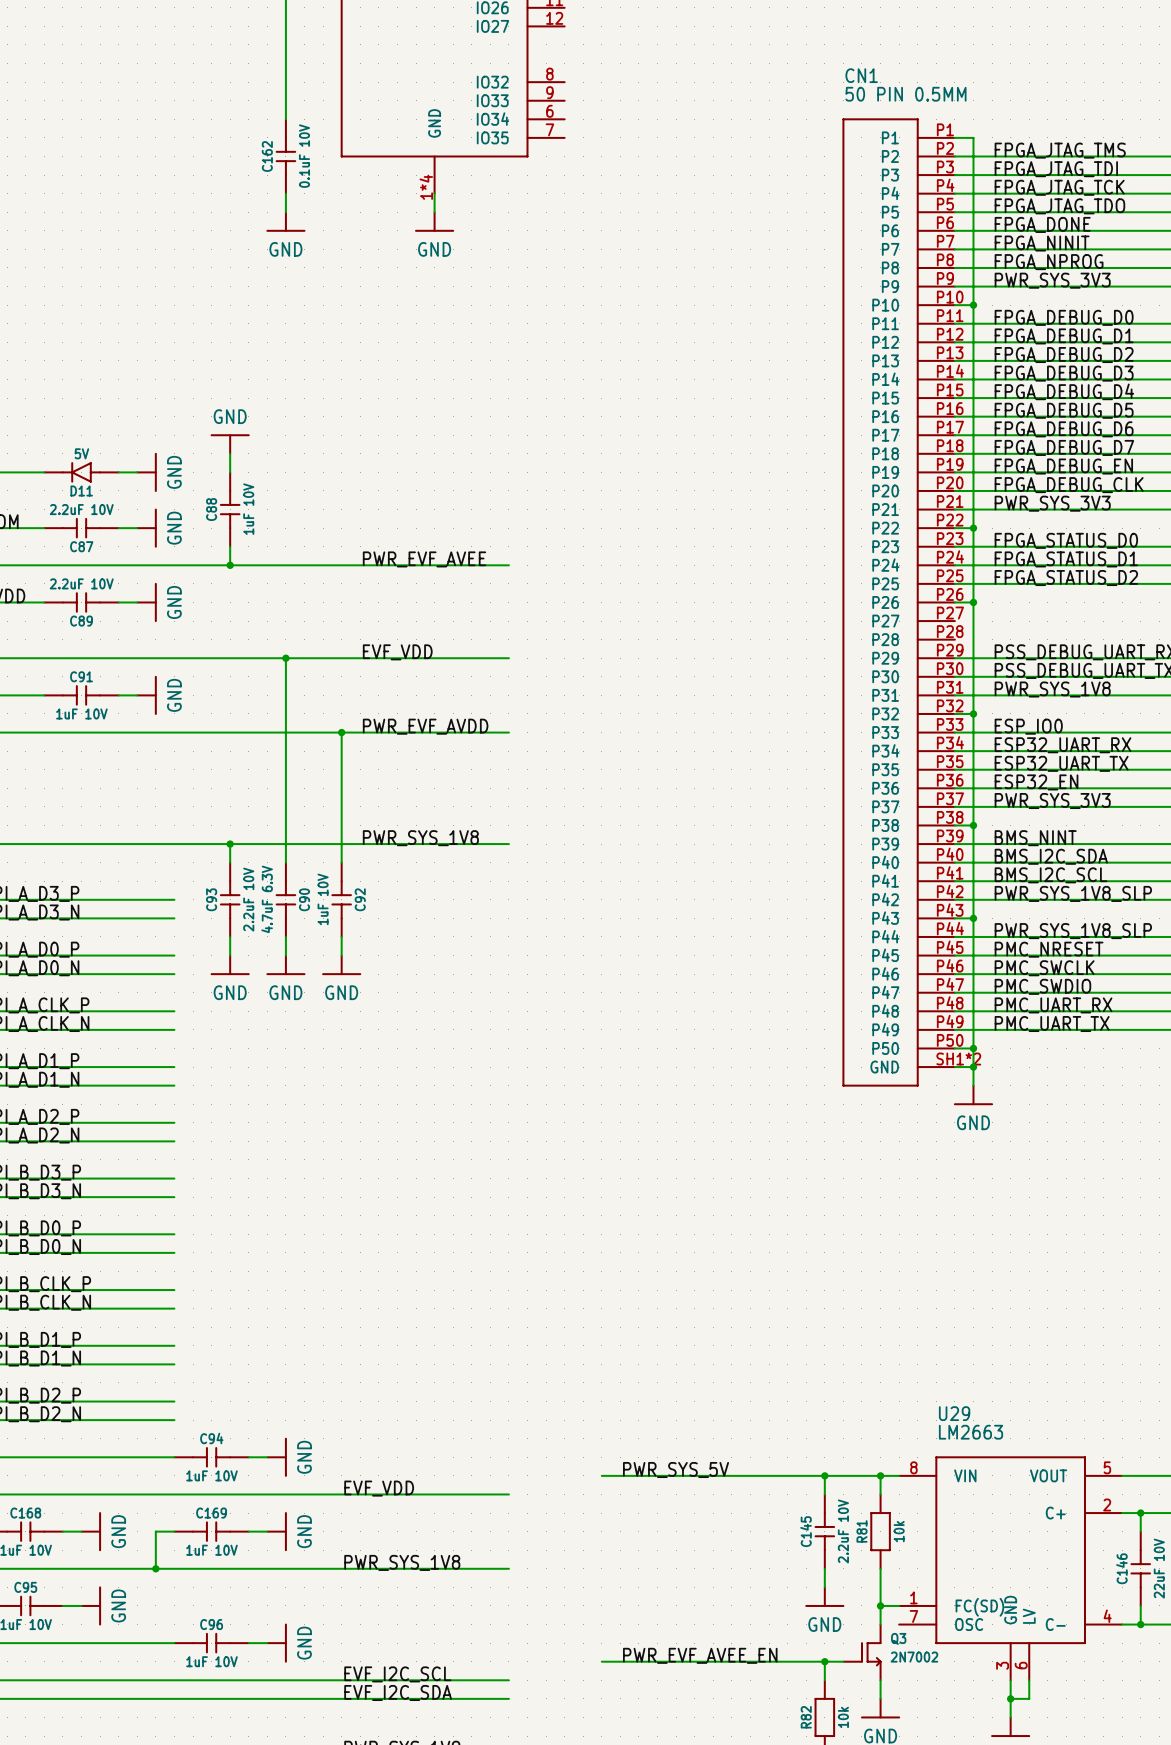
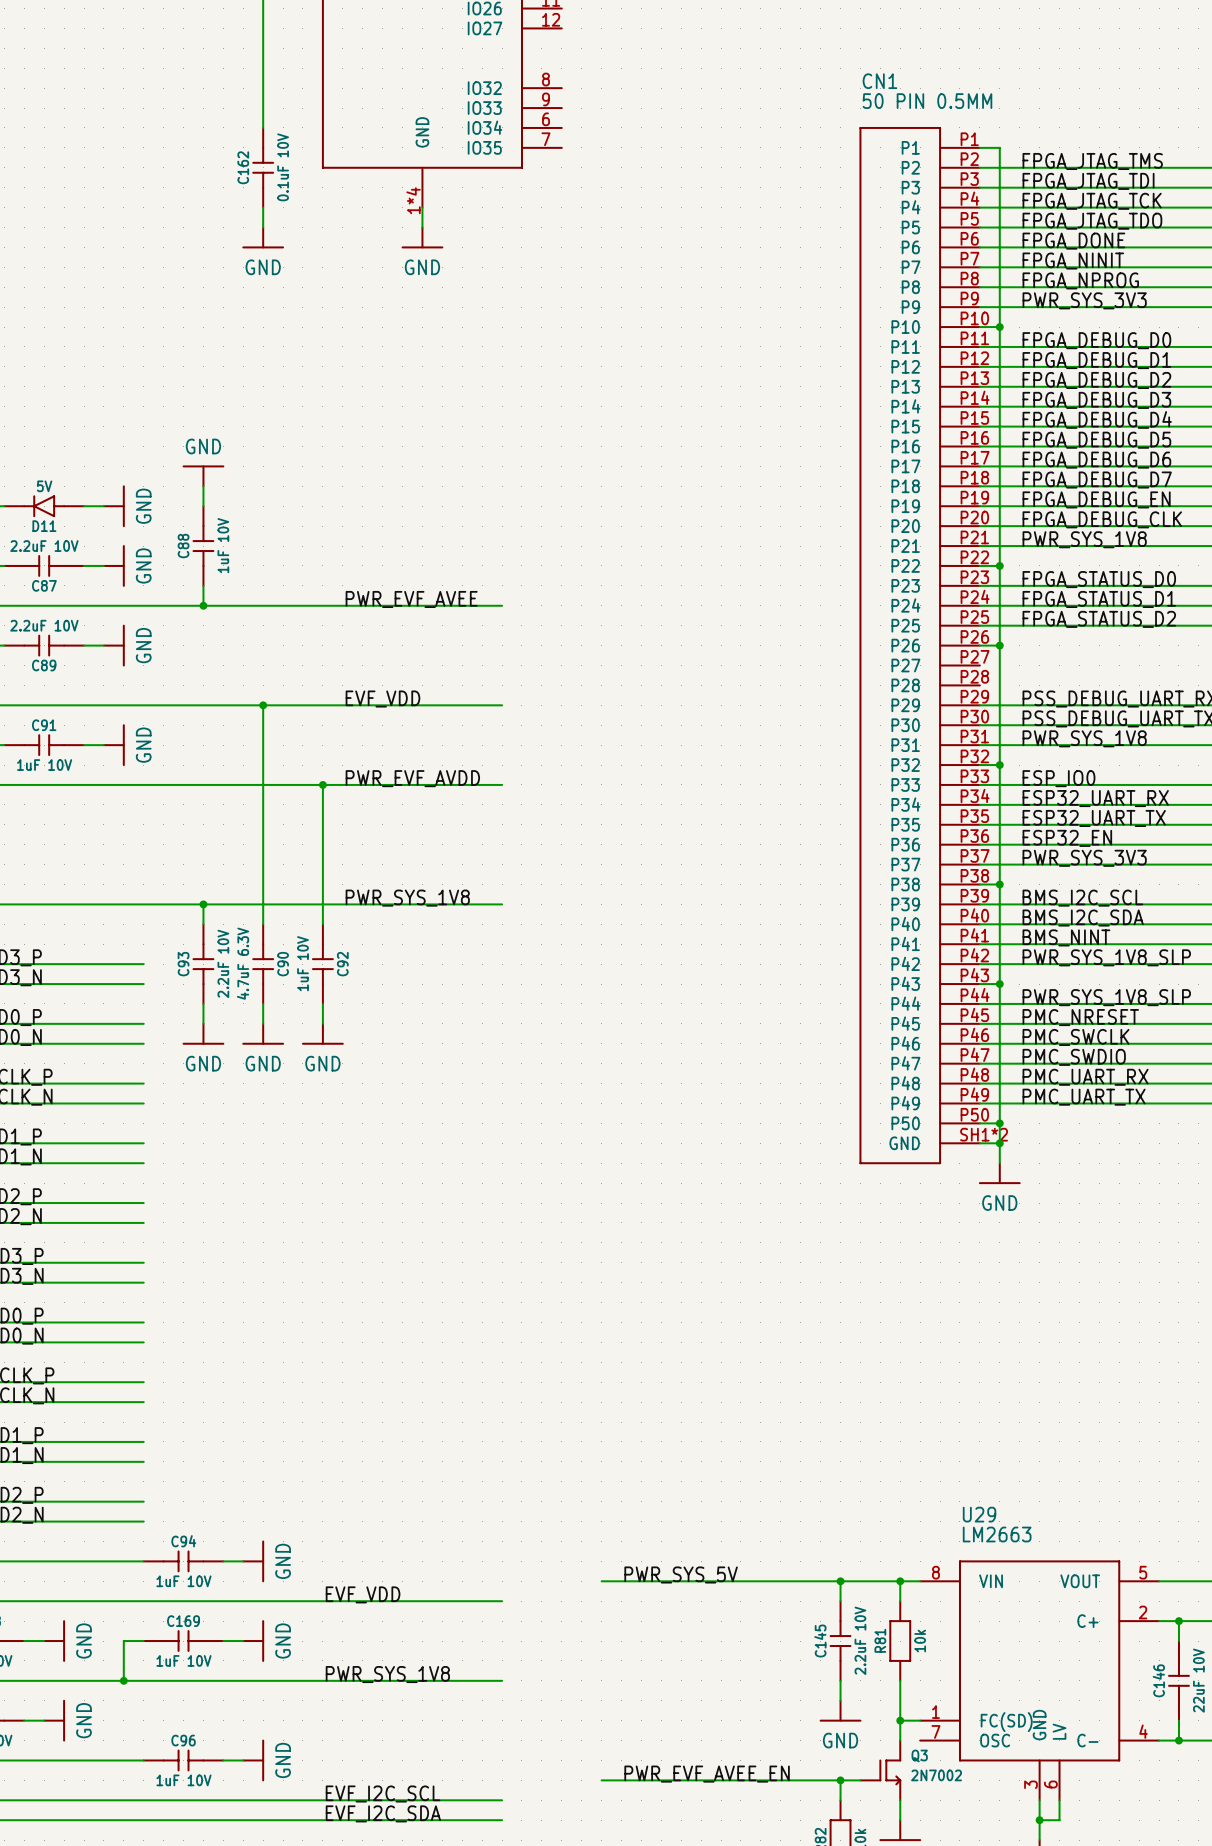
label: PWR_SYS_3V3 (1052, 503) -> PWR_SYS_1V8 (1084, 539)
label: BMS_NINT (1035, 838) -> BMS_I2C_SCL (1082, 898)
label: BMS_I2C_SCL (1051, 875) -> BMS_NINT (1066, 937)

